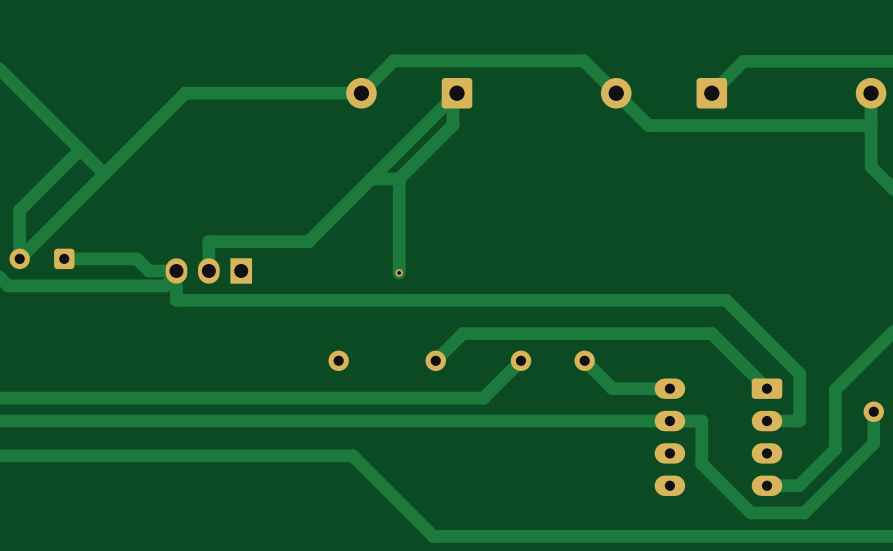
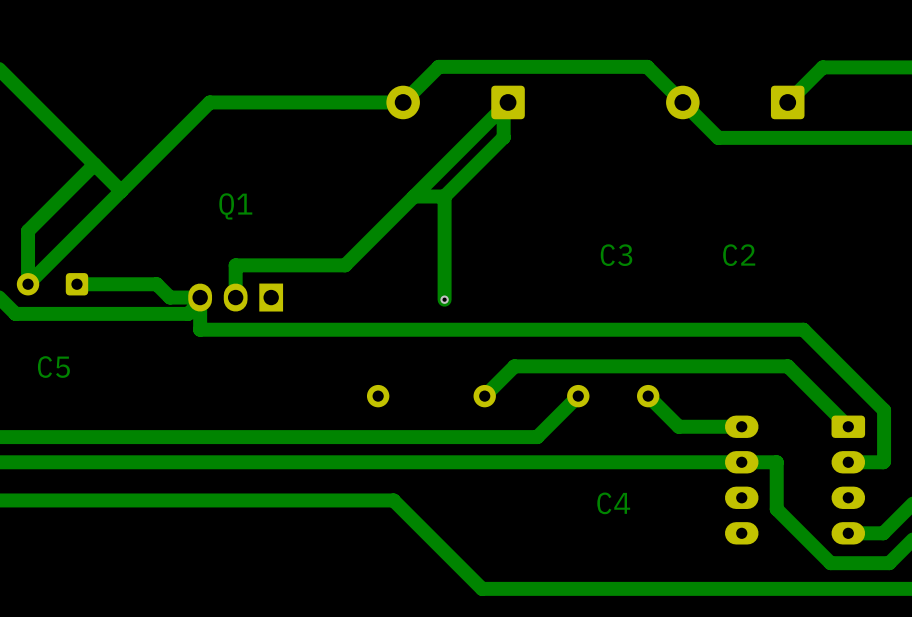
text: none -> Q1 (235, 206)
text: none -> C3 (616, 255)
text: none -> C2 (739, 255)
text: none -> C5 (53, 367)
text: none -> C4 (613, 503)

